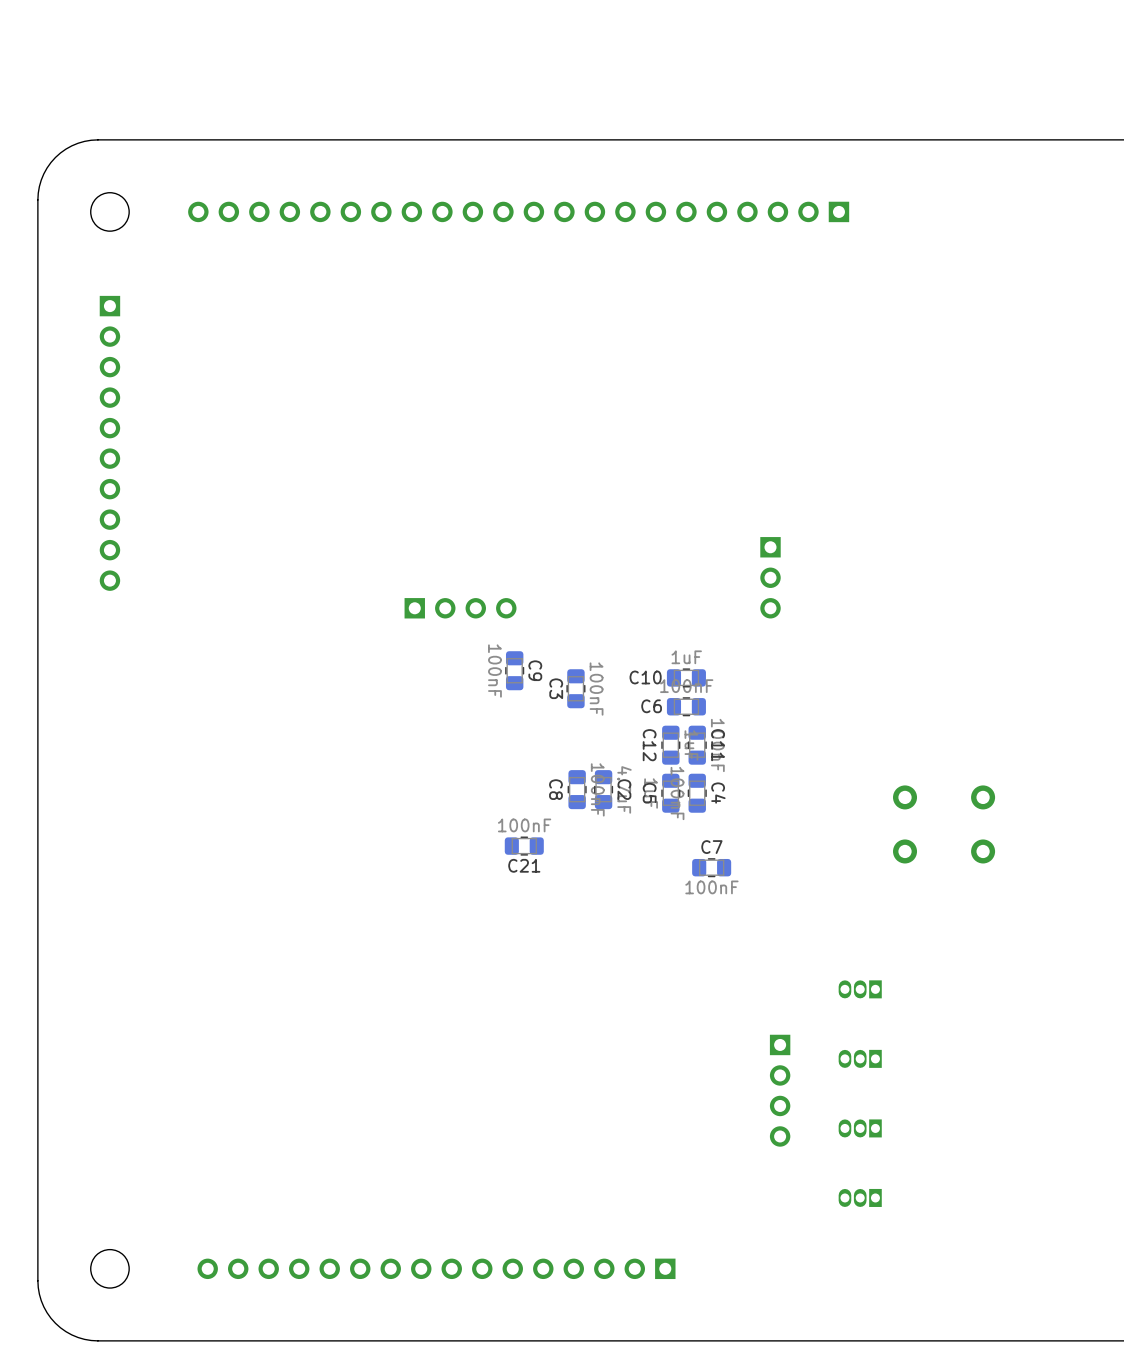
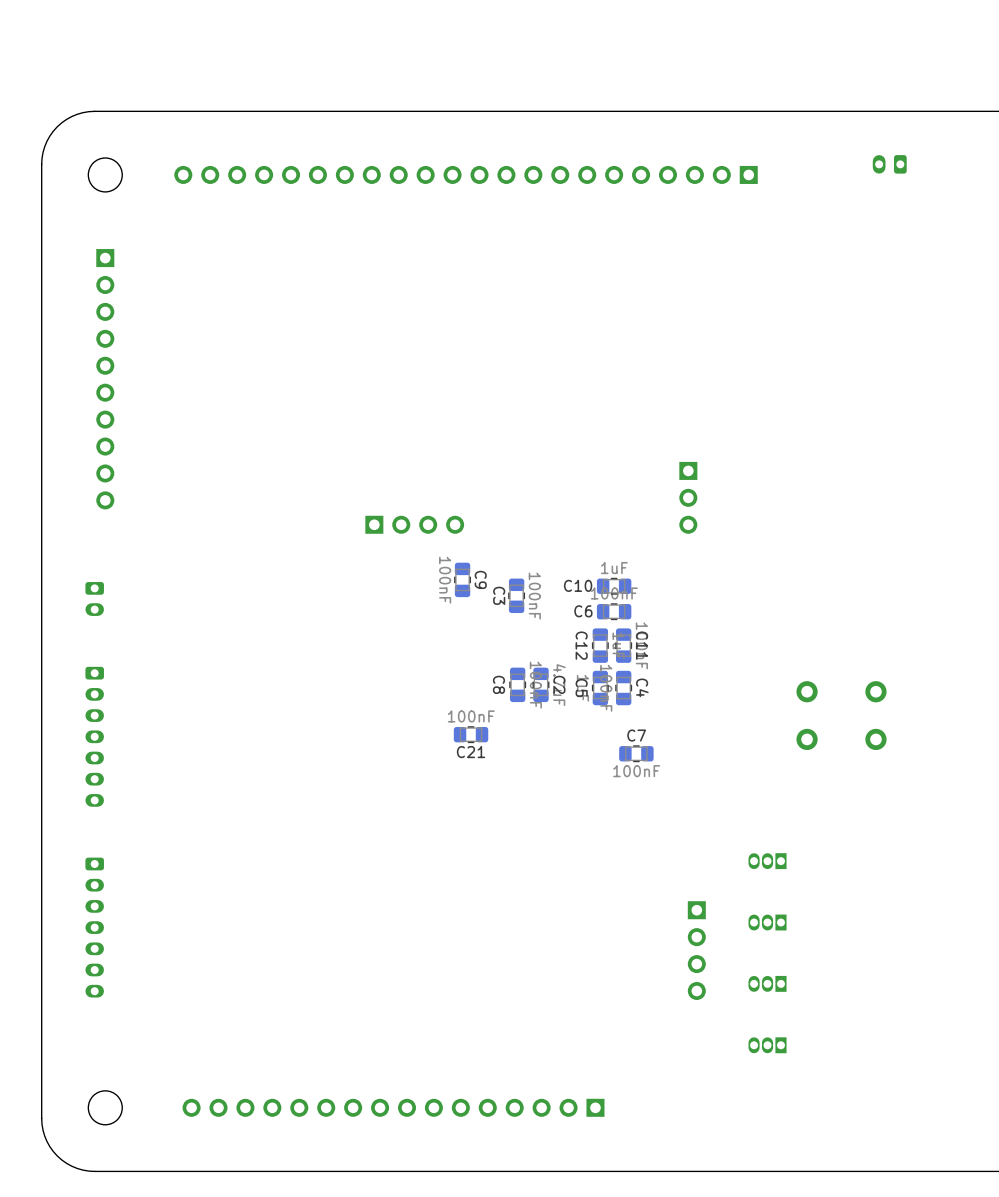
part: none -> (889, 164)
part: none -> (94, 598)
part: none -> (94, 736)
part: none -> (94, 927)

